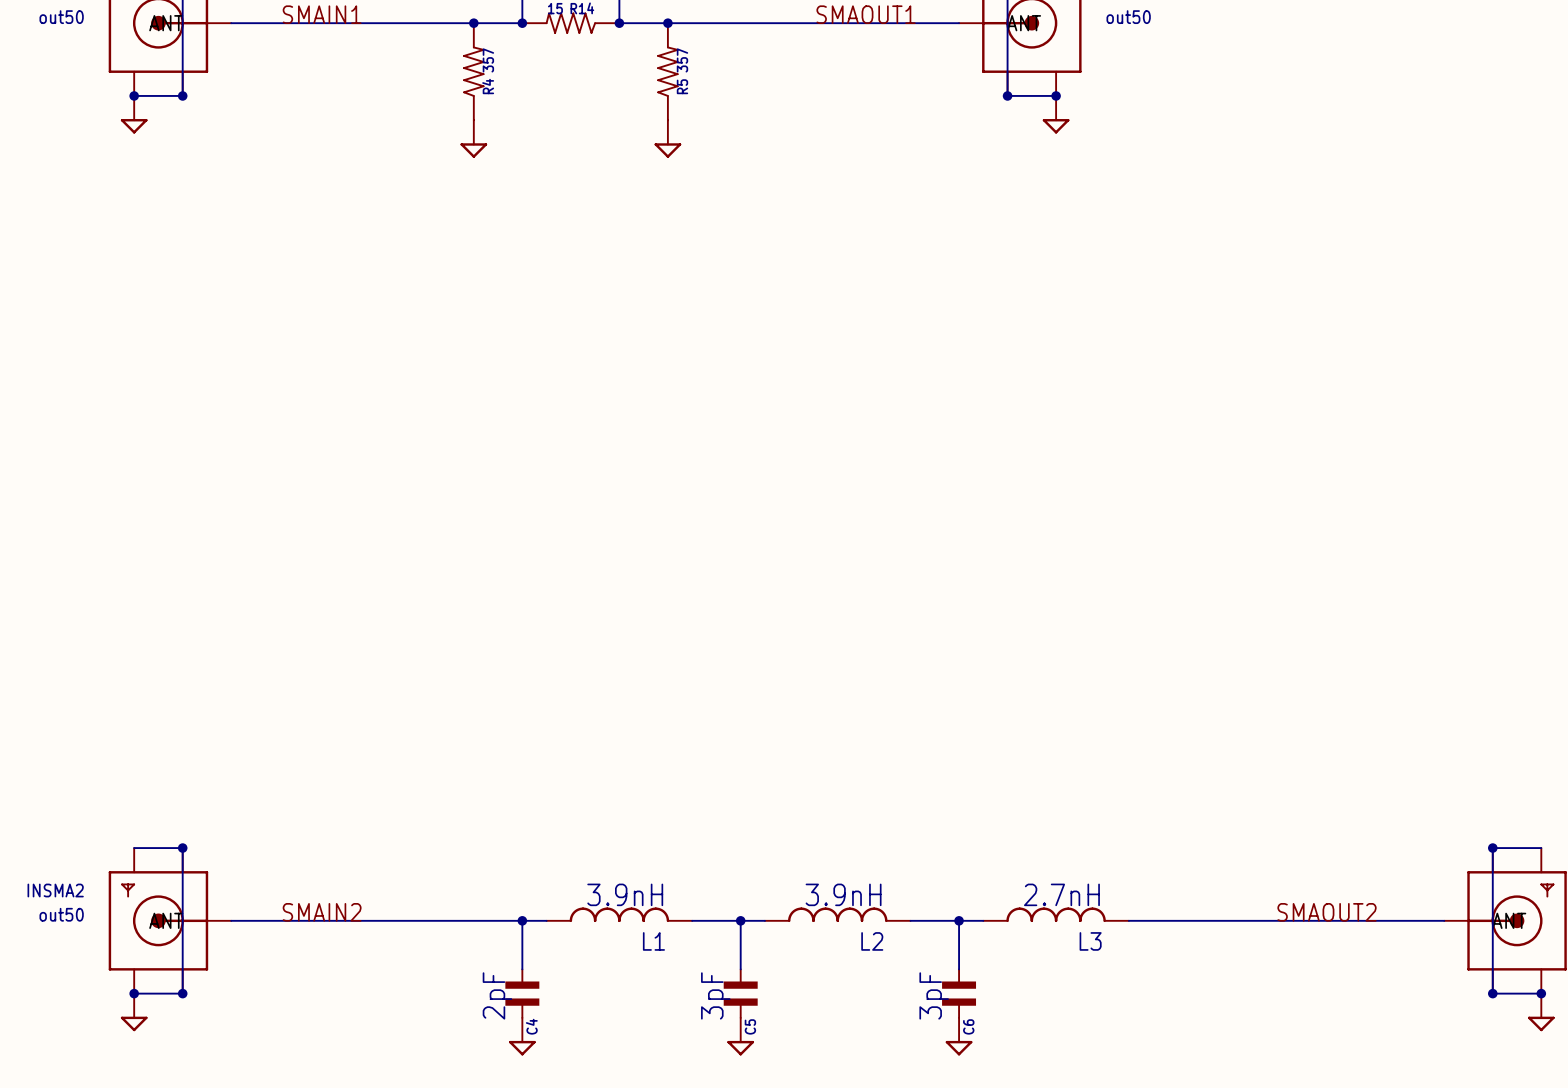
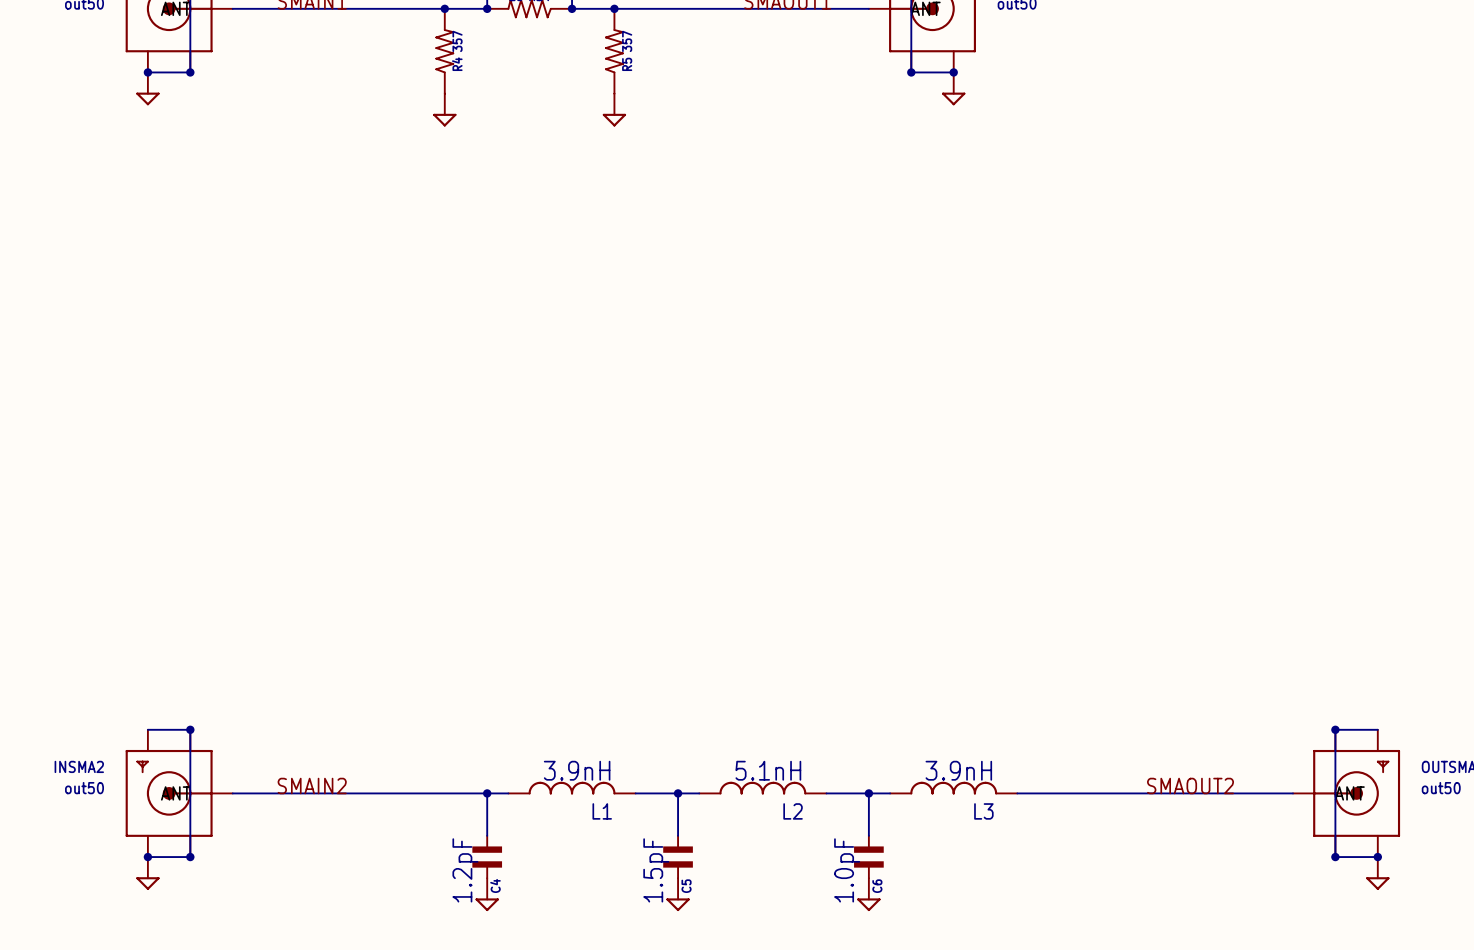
L2 value: 3.9nH (843, 894) -> 5.1nH (768, 770)
L3 value: 2.7nH (1061, 894) -> 3.9nH (958, 770)
C4 value: 2pF (497, 995) -> 1.2pF (465, 870)
C5 value: 3pF (715, 995) -> 1.5pF (656, 870)
C6 value: 3pF (934, 995) -> 1.0pF (847, 870)

